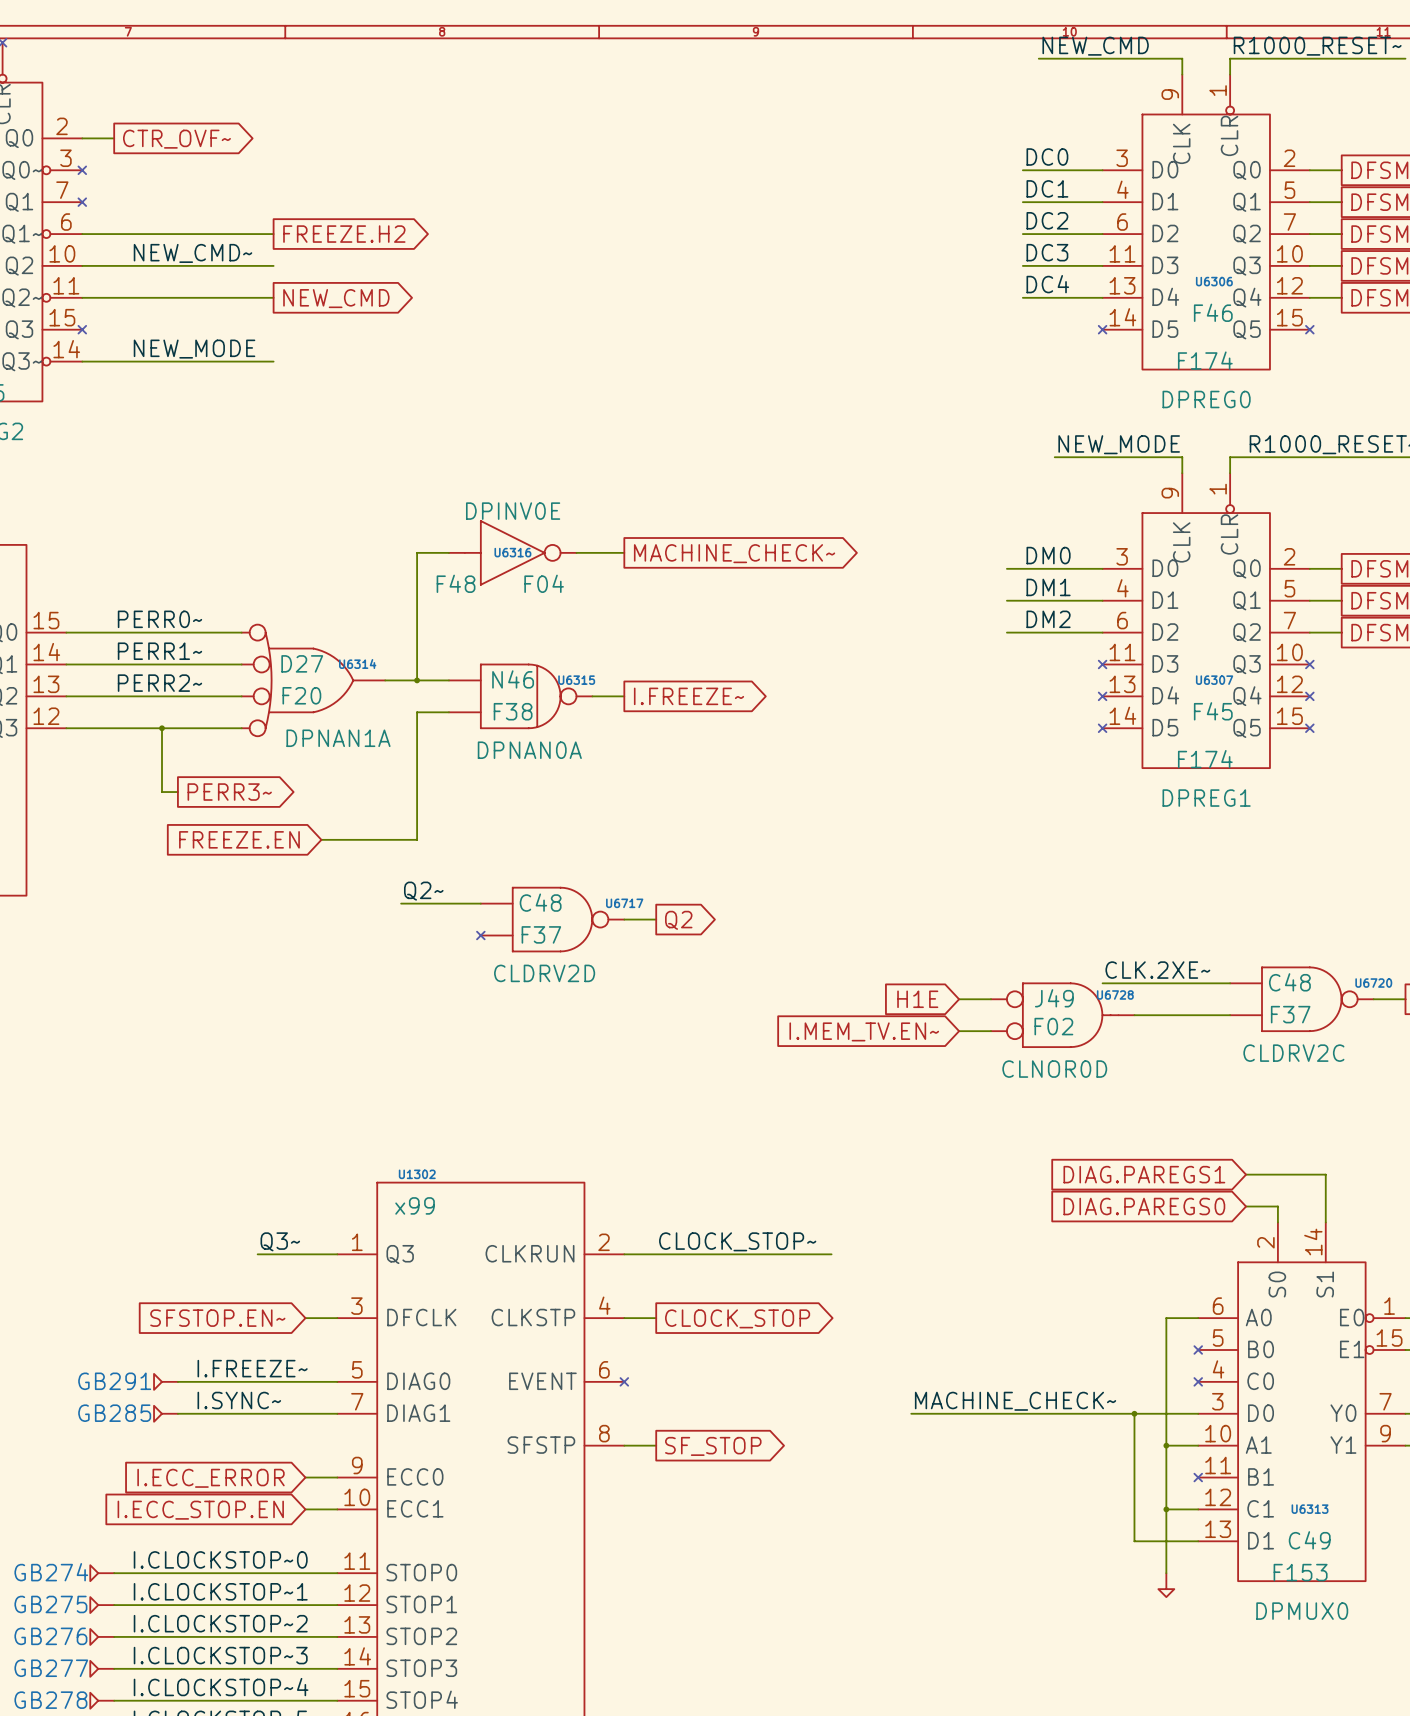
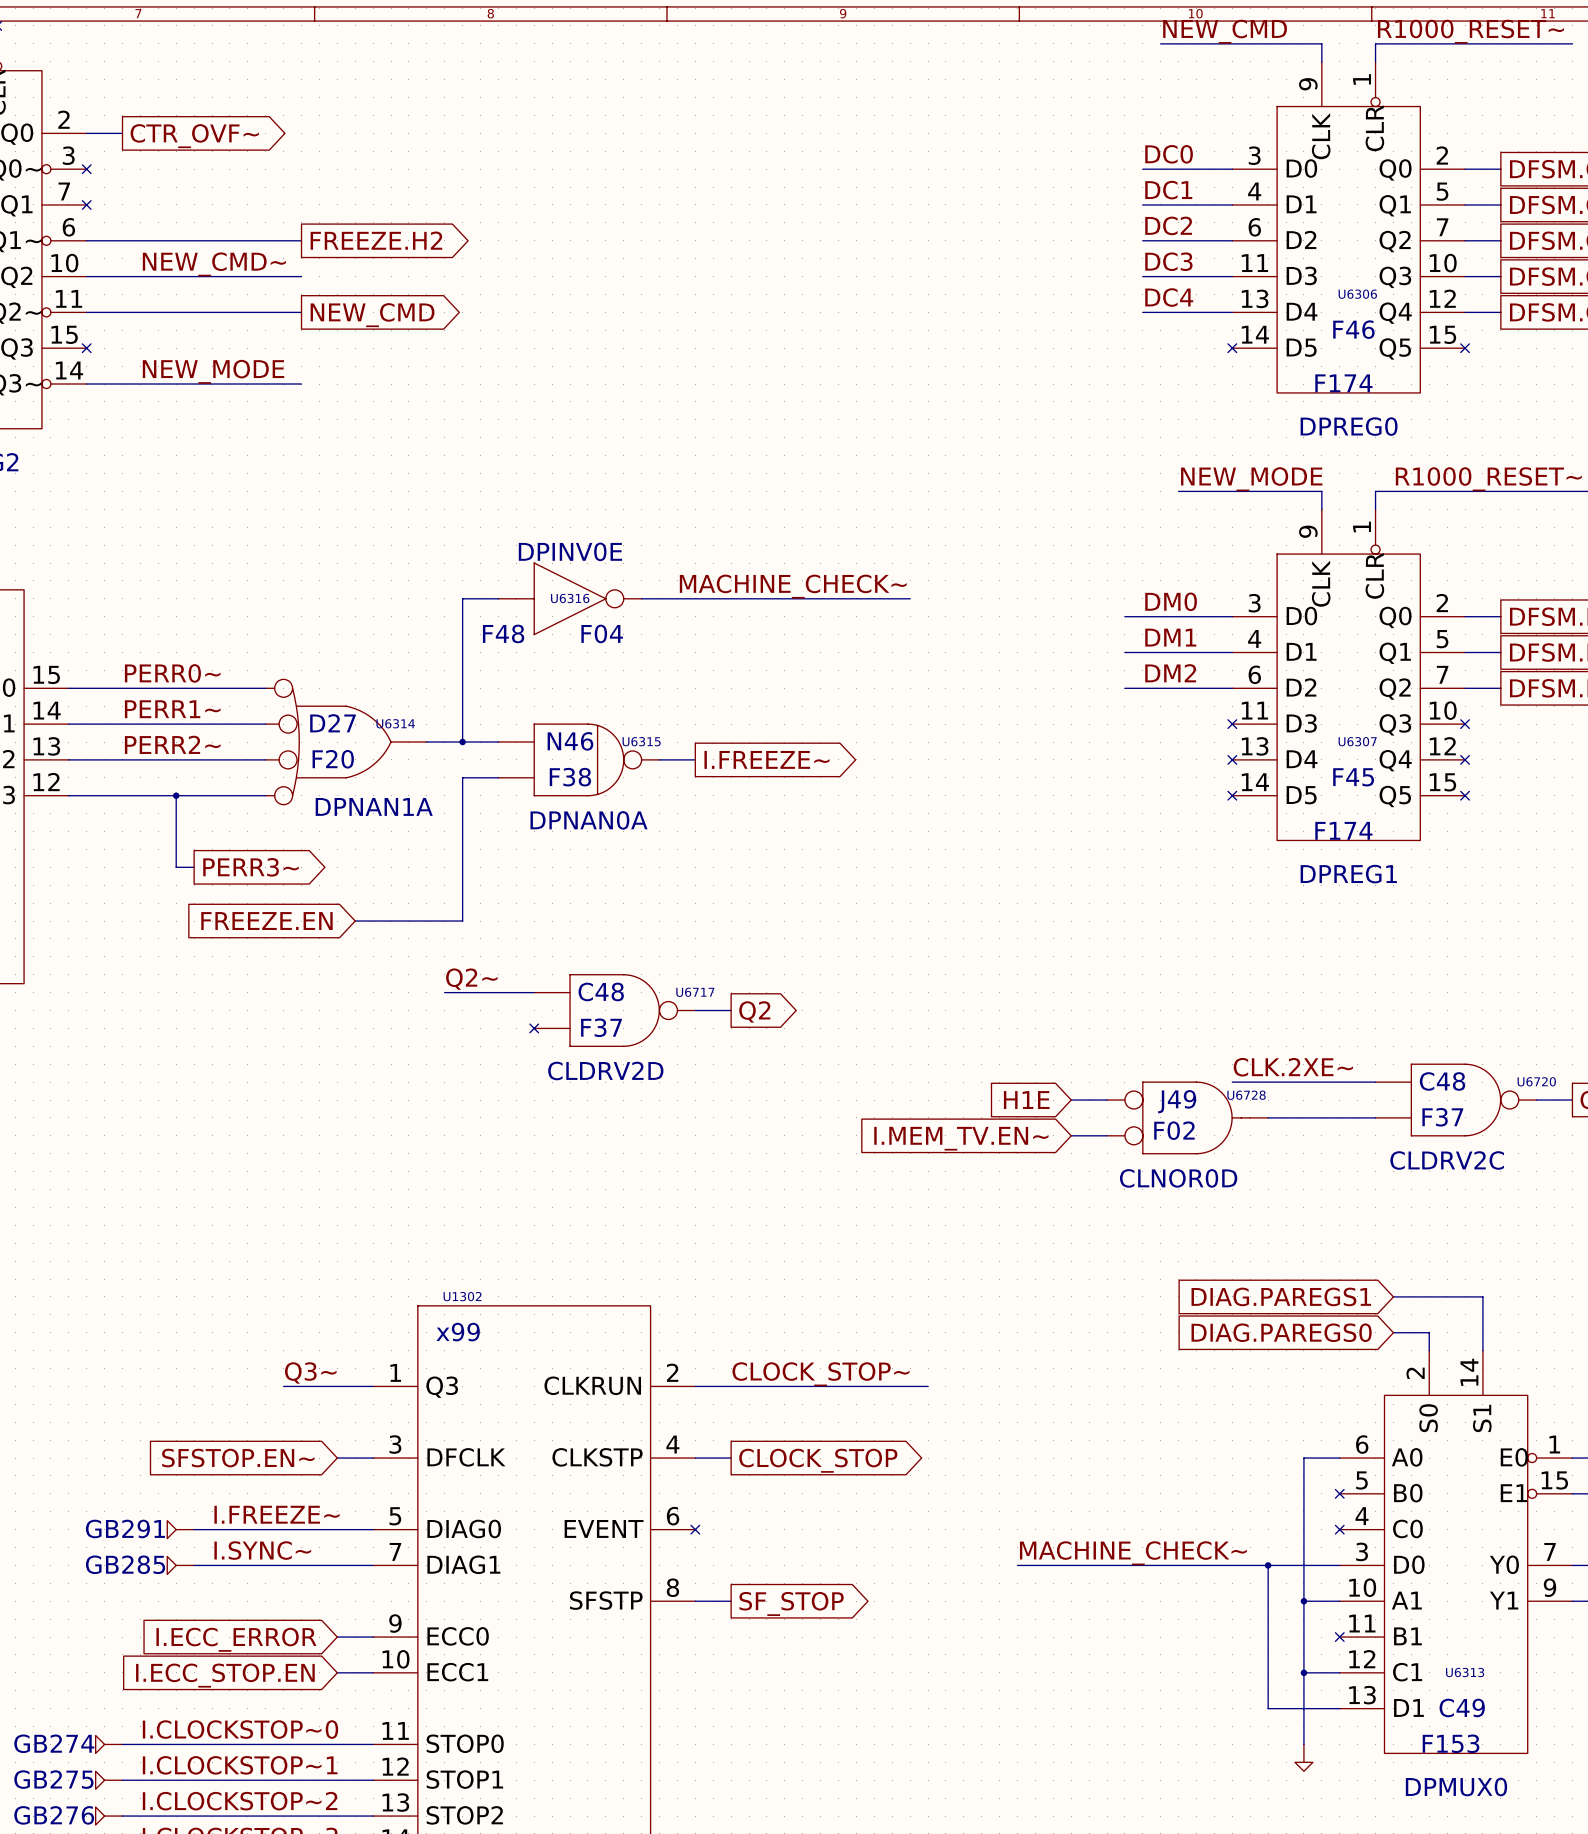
label: none -> MACHINE_CHECK~ (793, 586)
wire: none -> (695, 598) (910, 598)
global label: MACHINE_CHECK~ (734, 553) -> none

